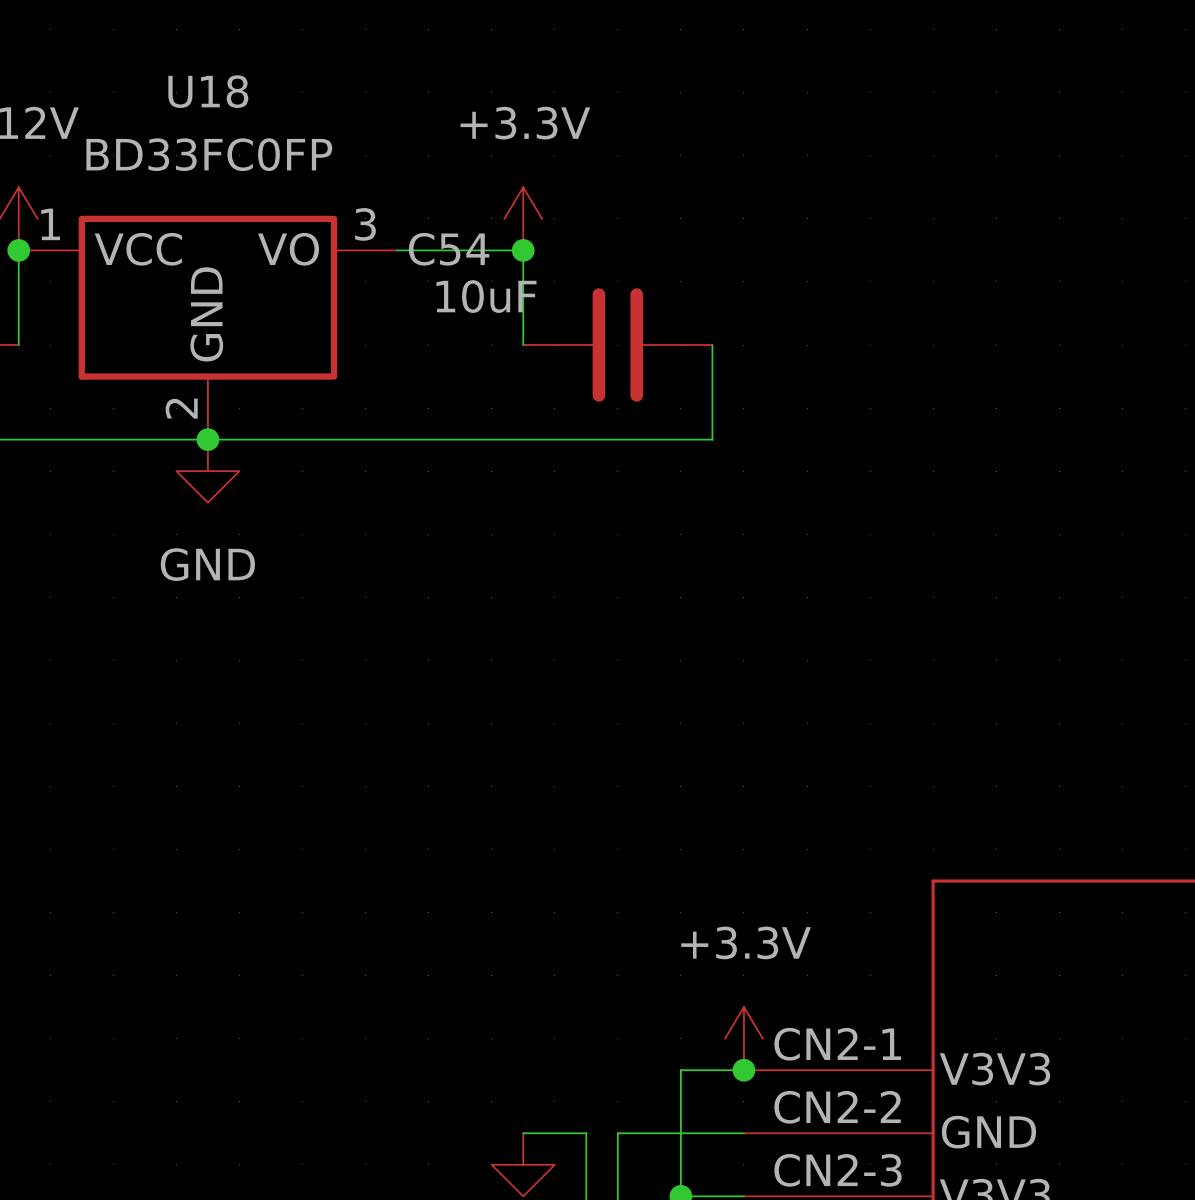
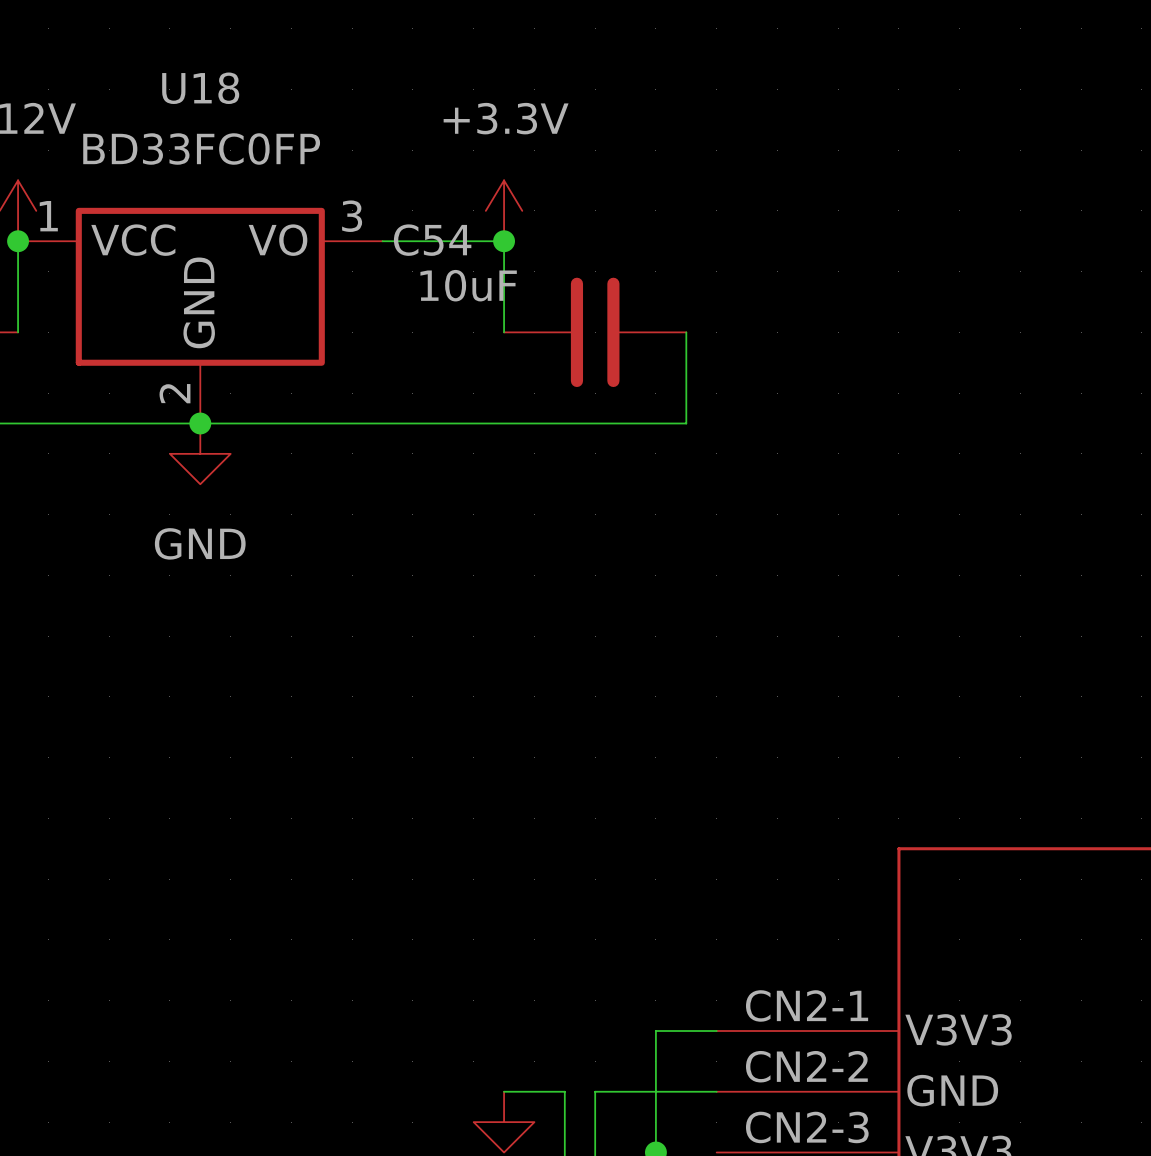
power symbol: +3.3V (743, 1038) -> none
junction: (743, 1070) -> none
wire: (680, 1196) (743, 1196) -> none

